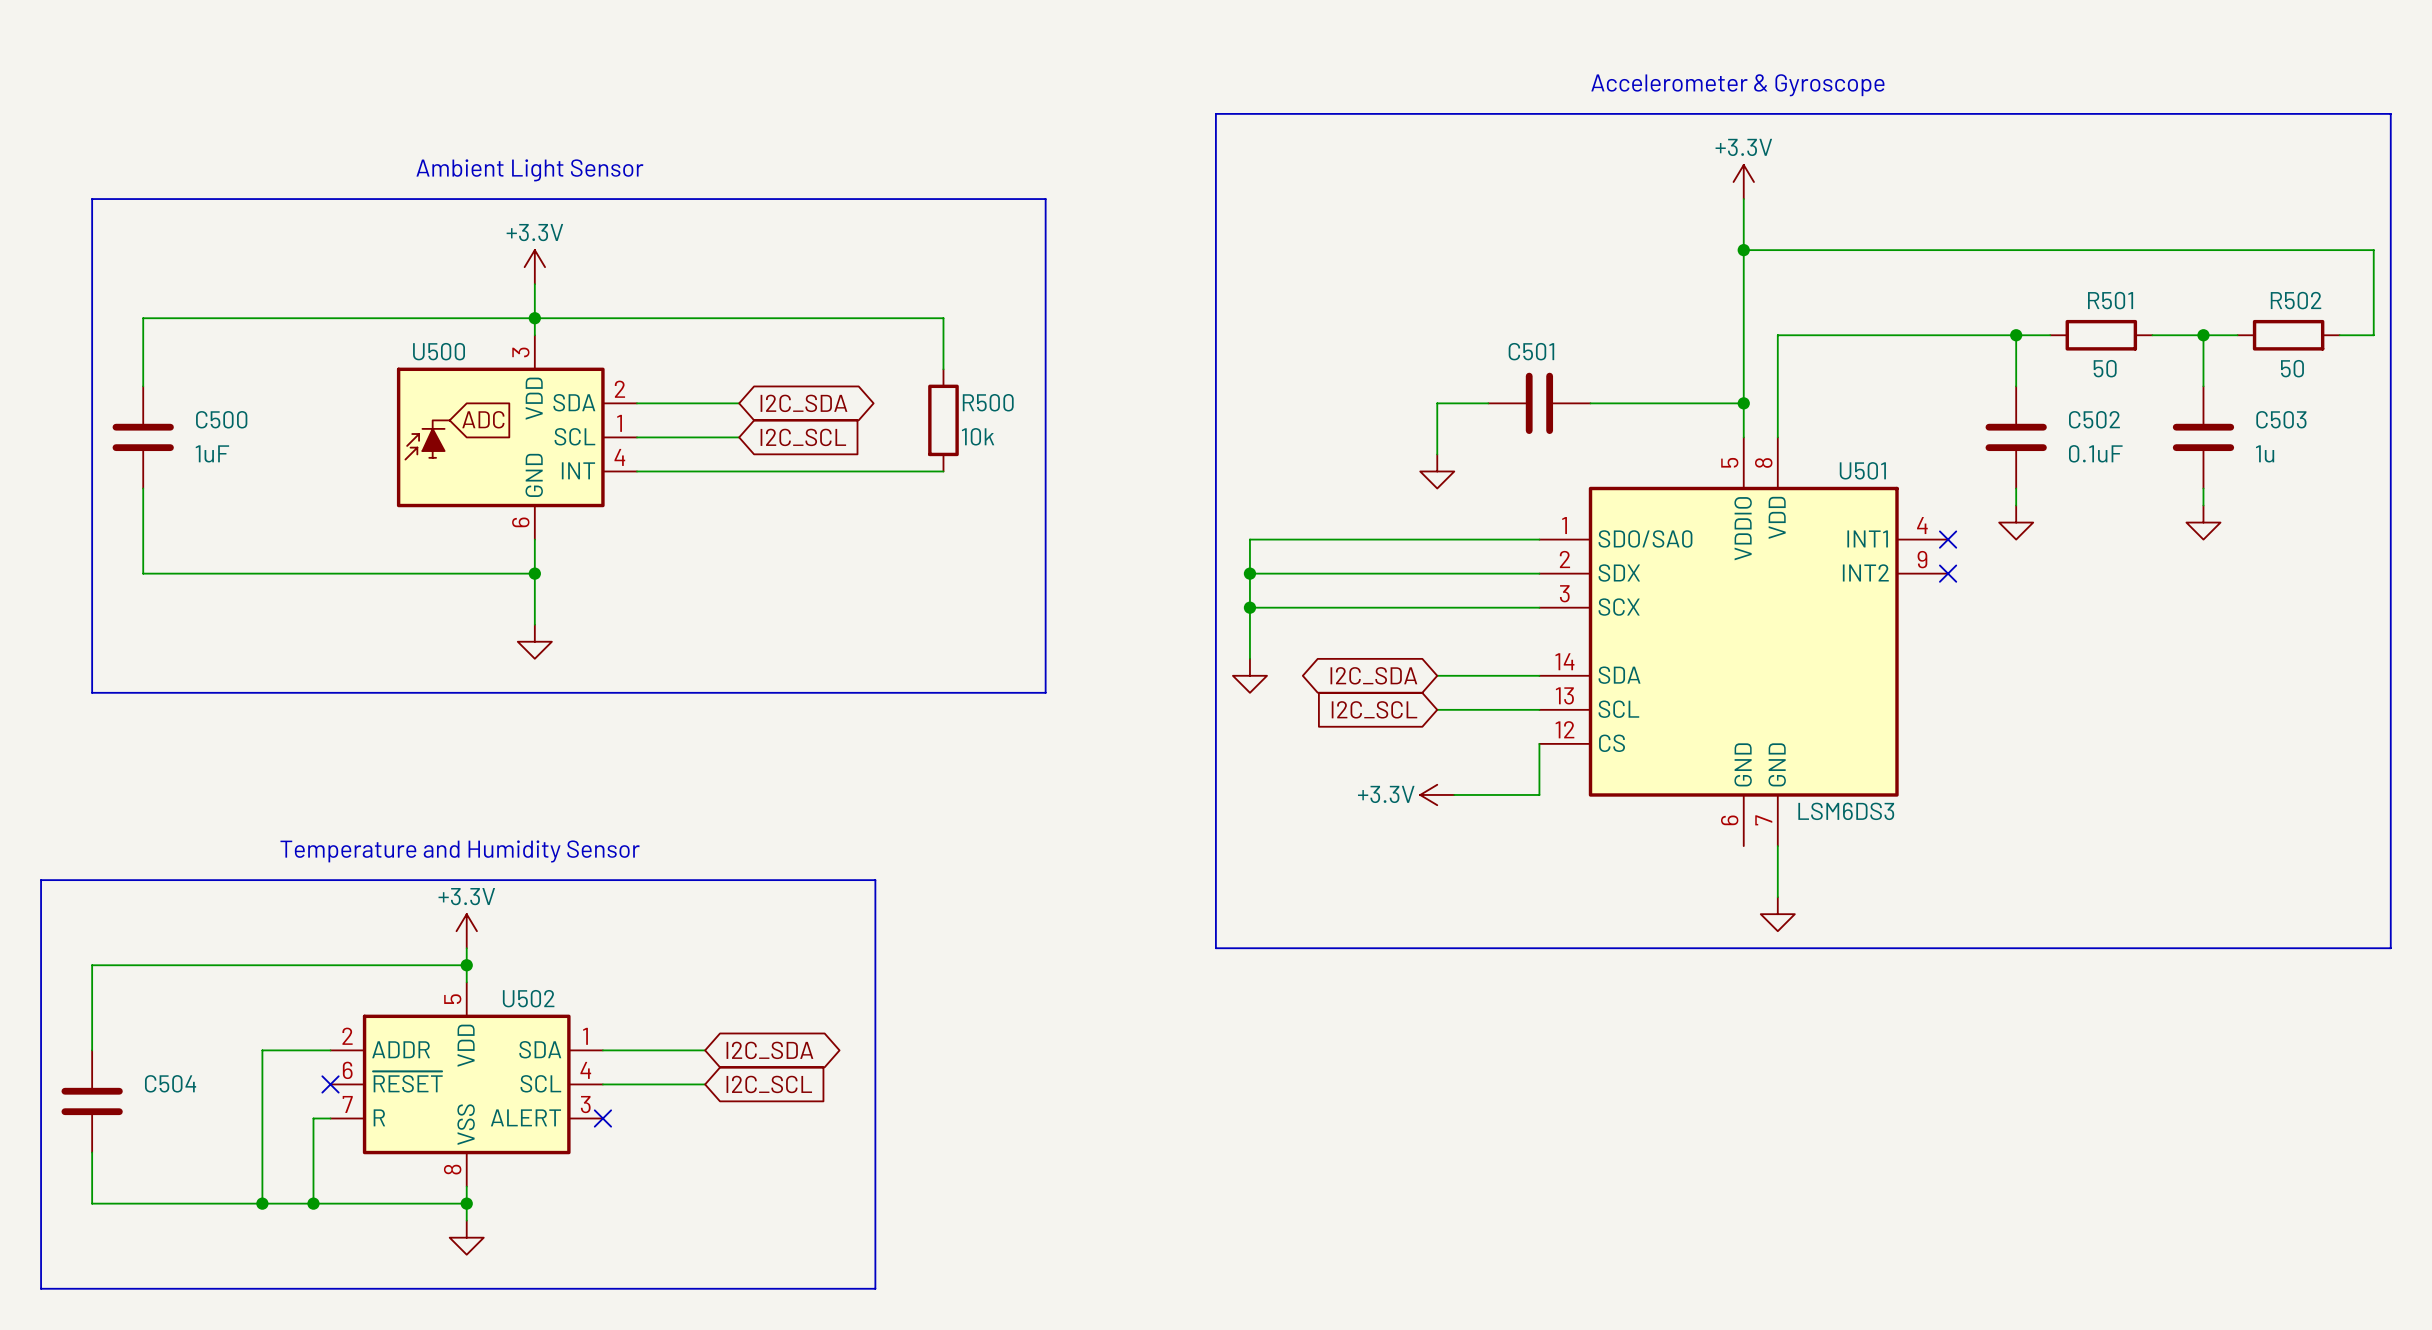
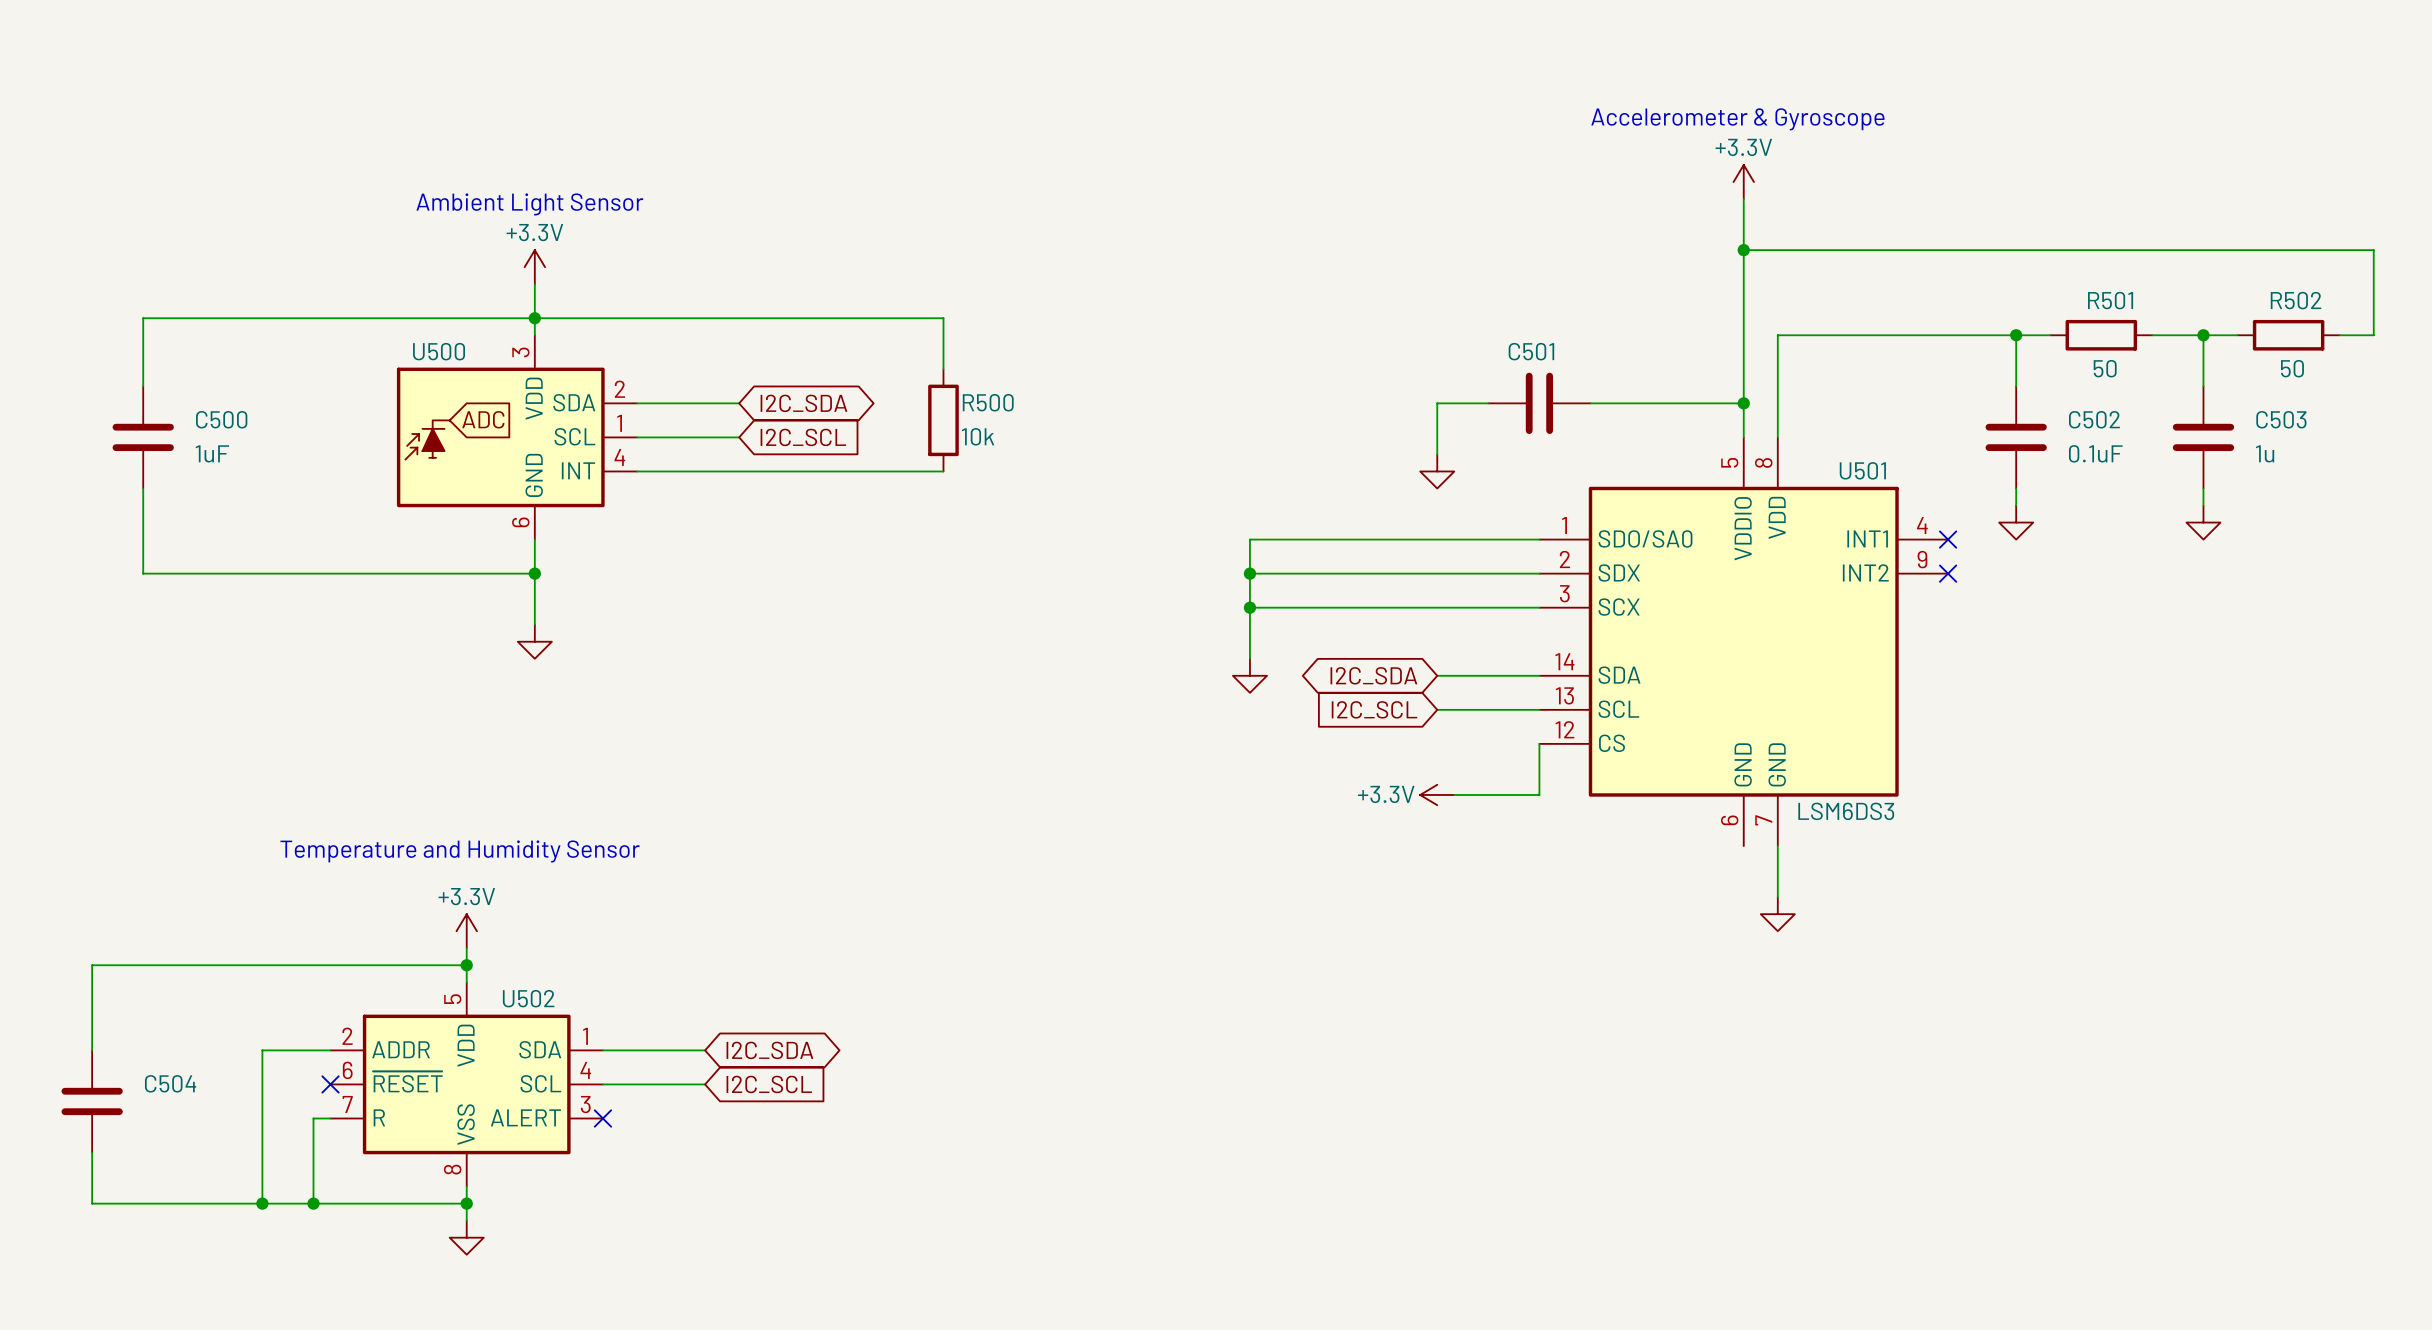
text position: Accelerometer & Gyroscope (1737, 85) -> Accelerometer & Gyroscope (1737, 119)
line: (1215, 113) (1215, 948) (2390, 948) (2390, 113) (1215, 113) -> none
text position: Ambient Light Sensor (529, 170) -> Ambient Light Sensor (529, 204)
line: (92, 199) (1045, 199) (1045, 692) (92, 692) (92, 199) -> none
line: (41, 880) (41, 1288) (875, 1288) (875, 880) (41, 880) -> none

